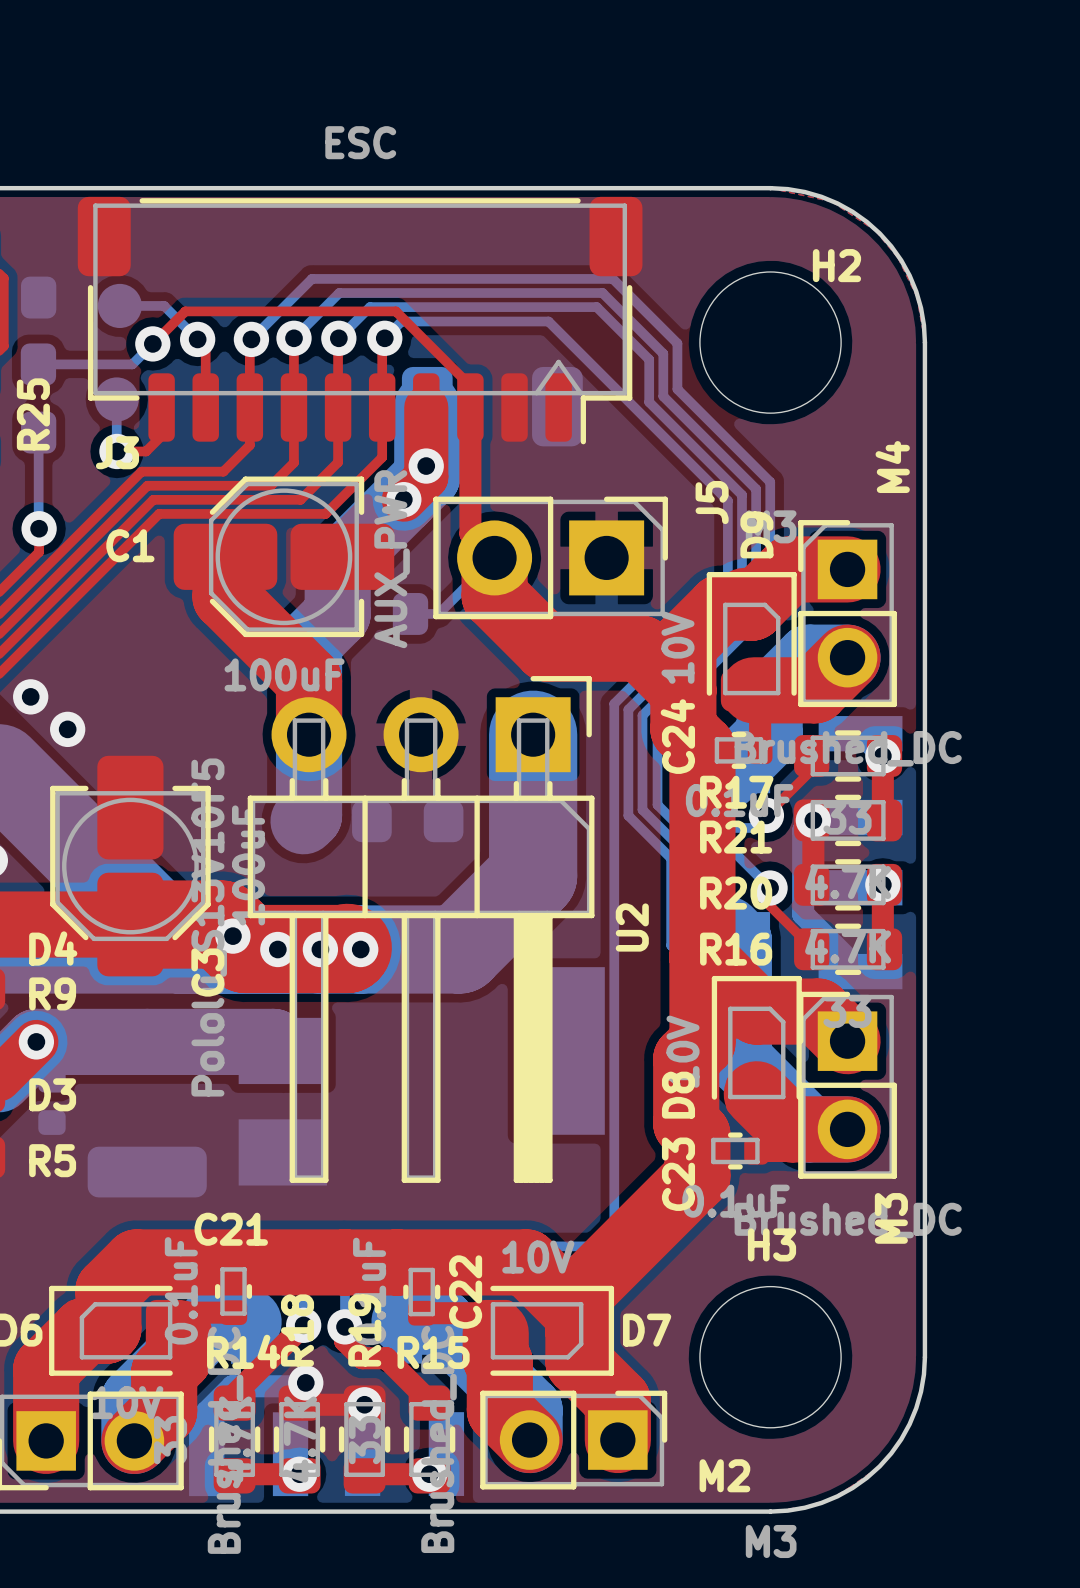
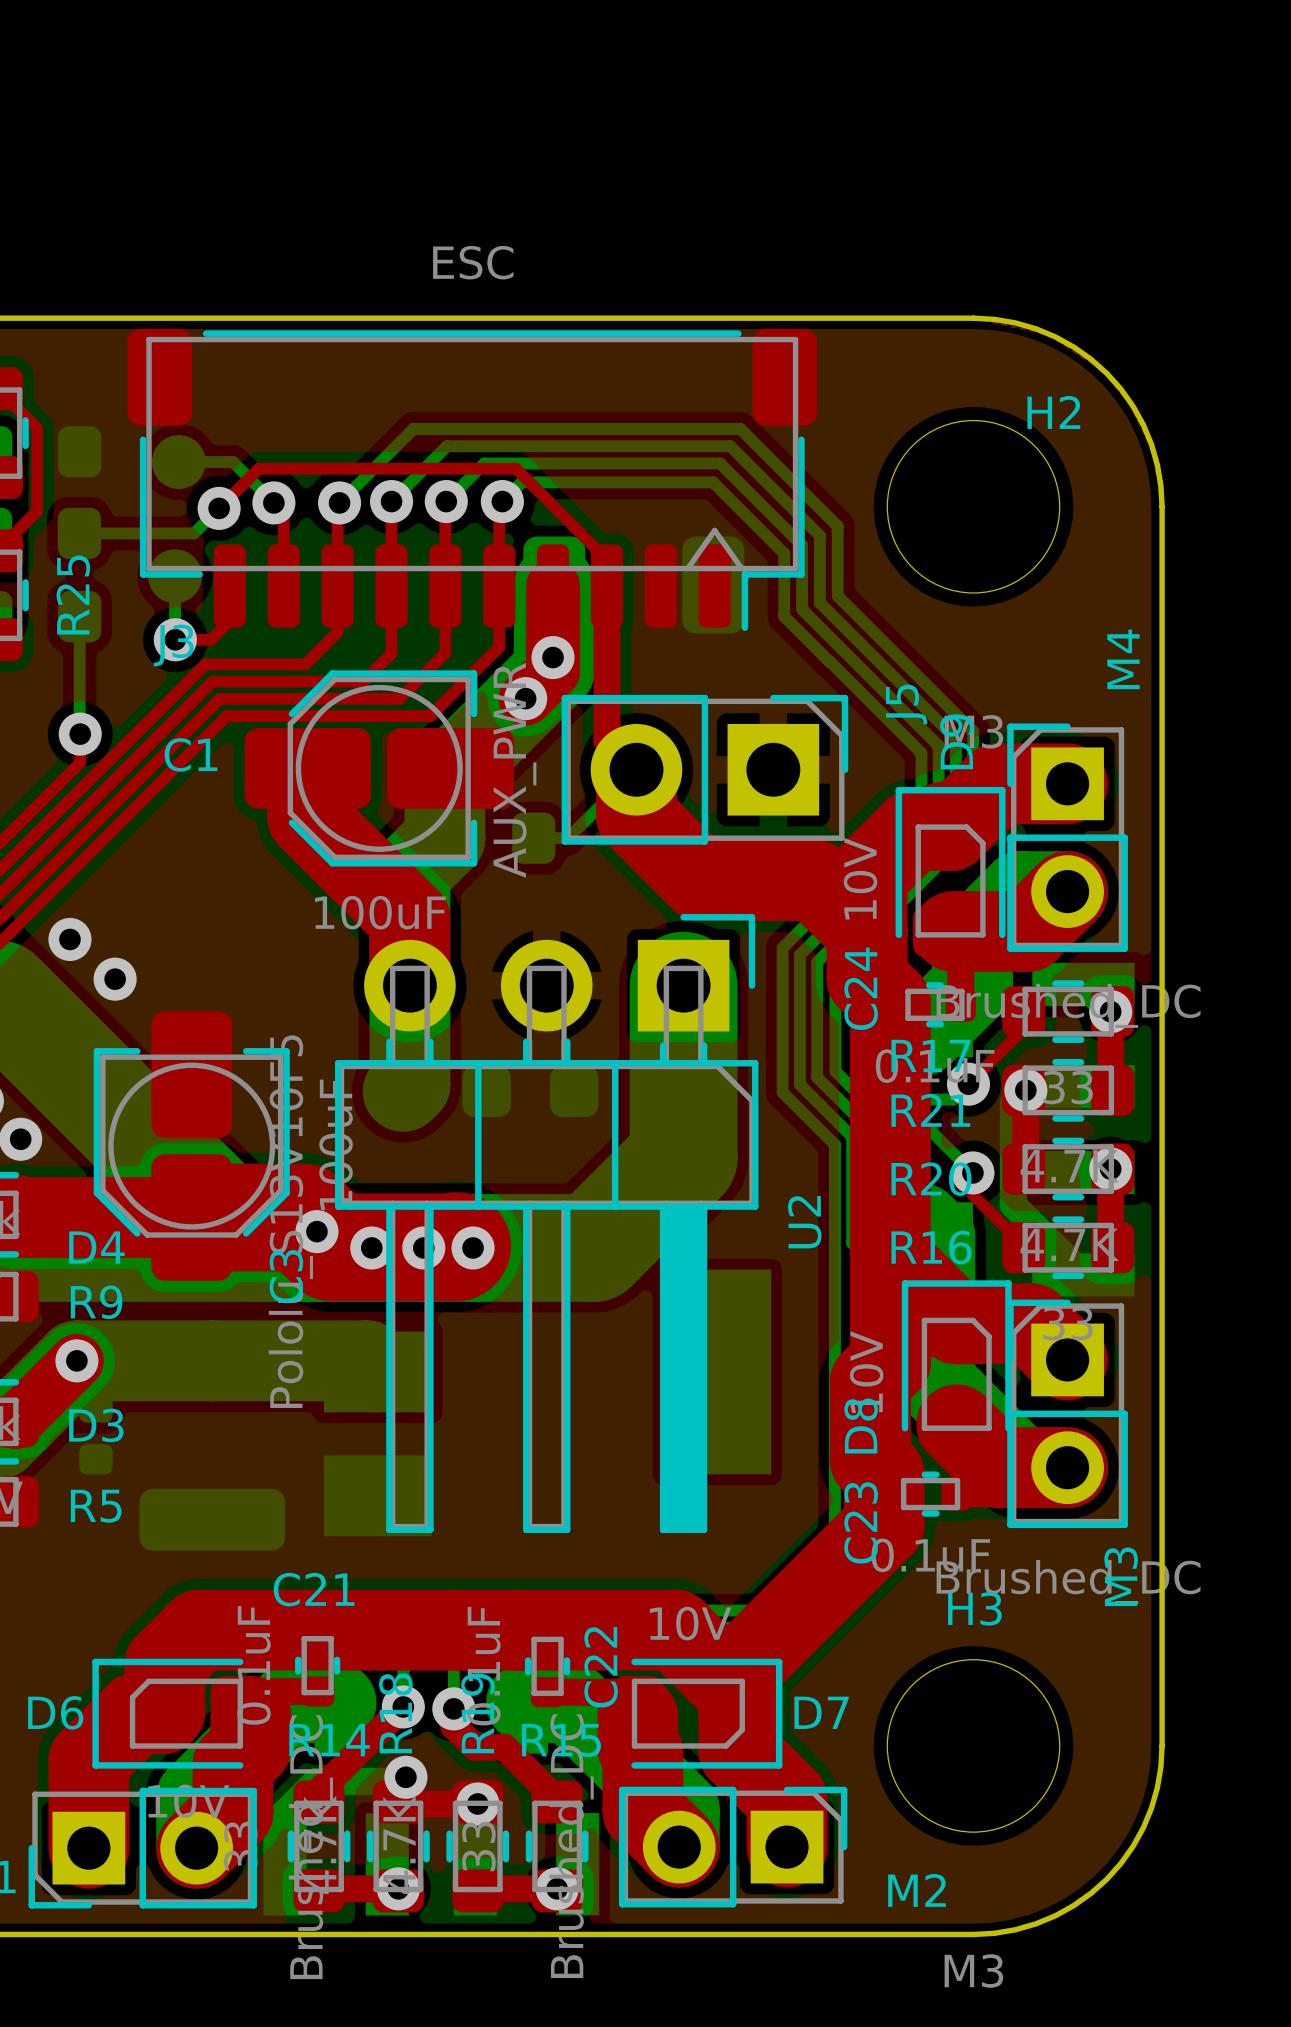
bottom track: (579, 278) (612, 278) (677, 343) (677, 389) (770, 482) (770, 526) -> (740, 429) (837, 526) (837, 595) (973, 731)
bottom track: (571, 293) (602, 293) (663, 353) (663, 396) (756, 489) (756, 532) -> (730, 446) (819, 535) (819, 602) (955, 738)
bottom track: (563, 307) (596, 307) (649, 359) (649, 402) (742, 494) (742, 538) -> (802, 608) (938, 745)
bottom track: none -> (720, 463) (802, 545) (802, 608)
bottom track: (400, 322) (548, 321) (727, 500) (727, 544) -> (521, 482) (713, 482) (784, 553) (784, 616) (829, 661)
bottom track: none -> (830, 661) (921, 753)
bottom track: (614, 822) (614, 1226) -> (782, 1092) (834, 1144) (834, 1533) (782, 1585)

